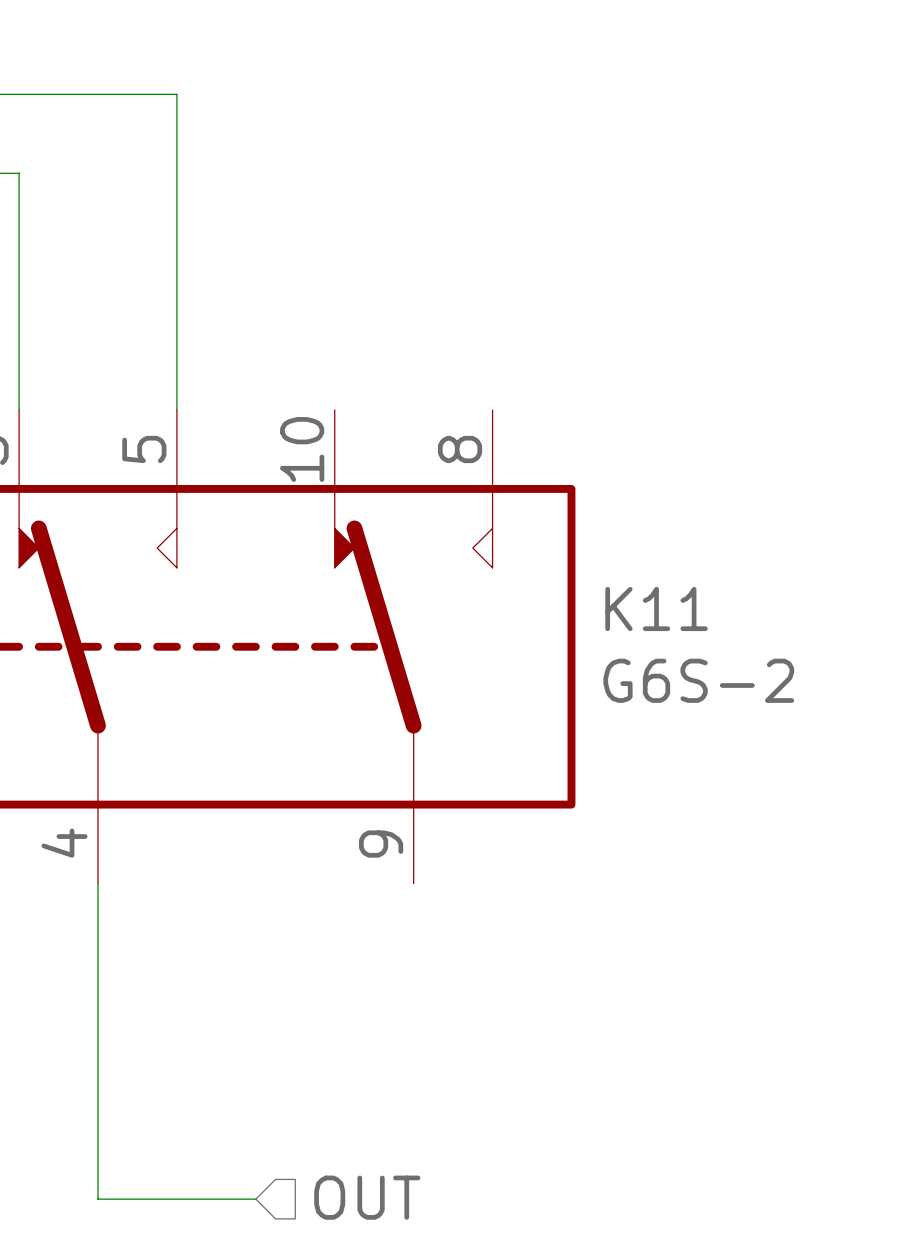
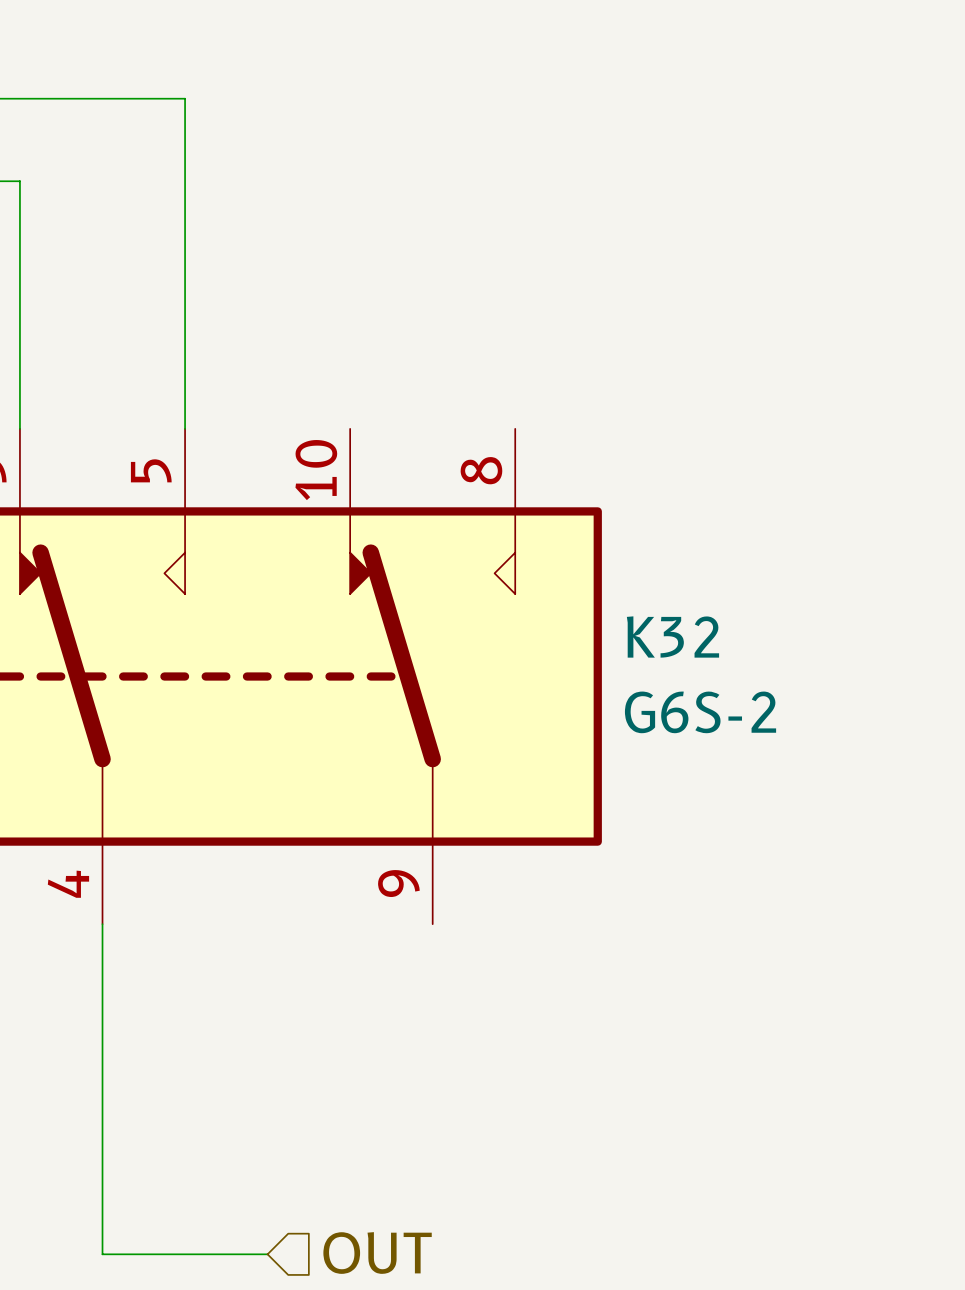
K11 name: K11 (656, 608) -> K32 (672, 636)

